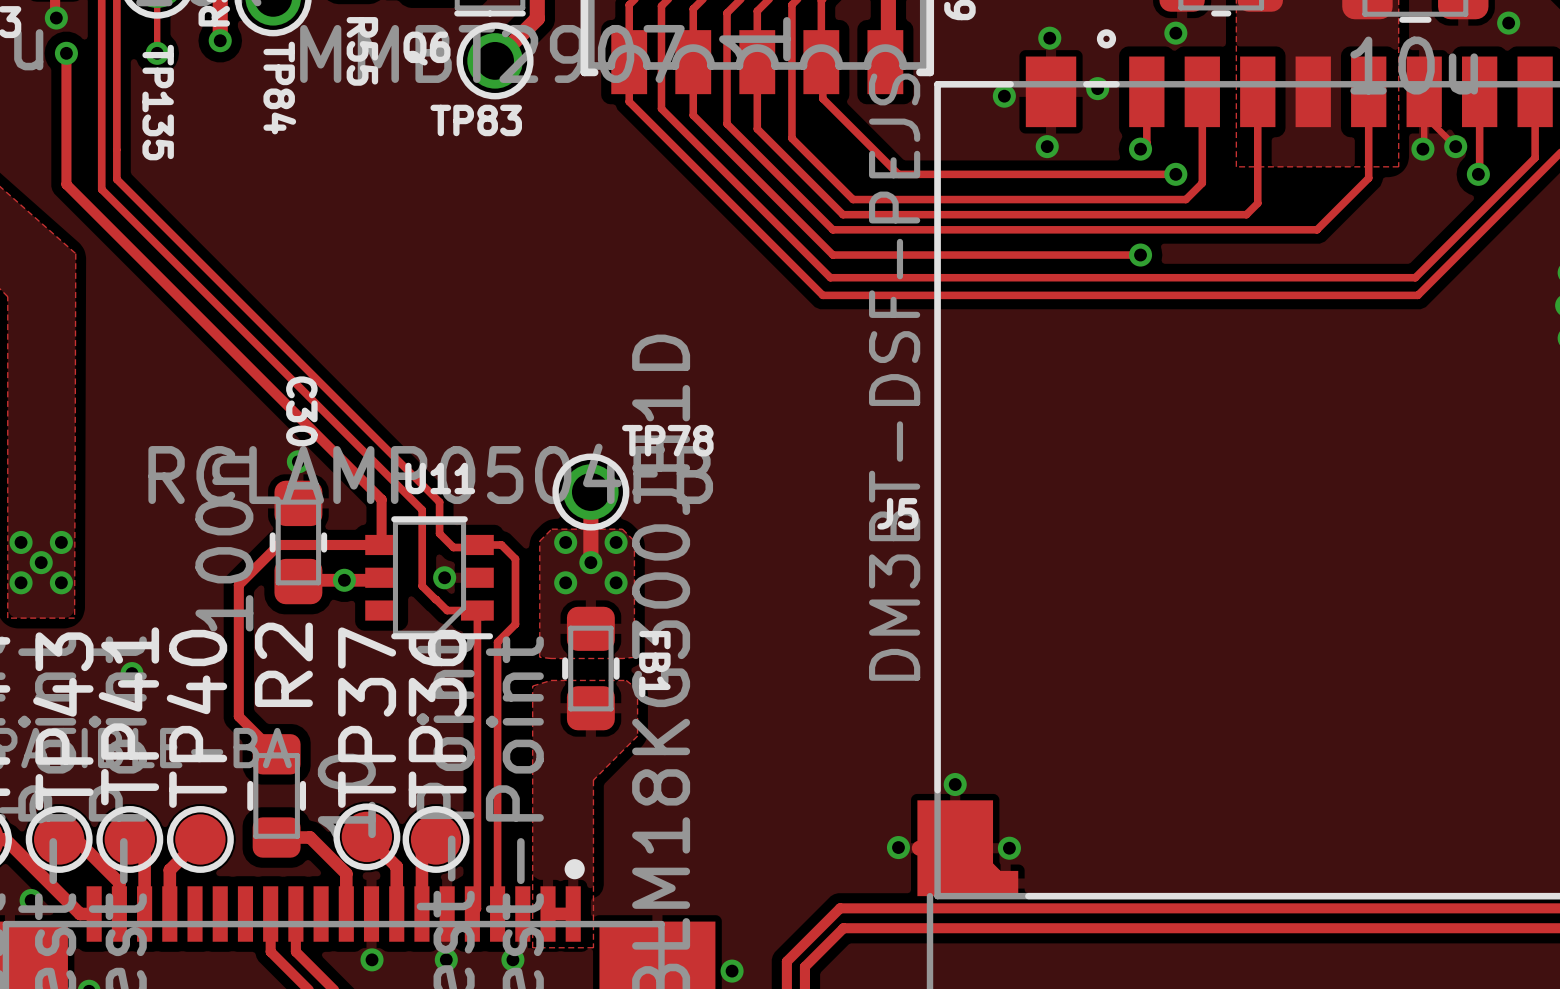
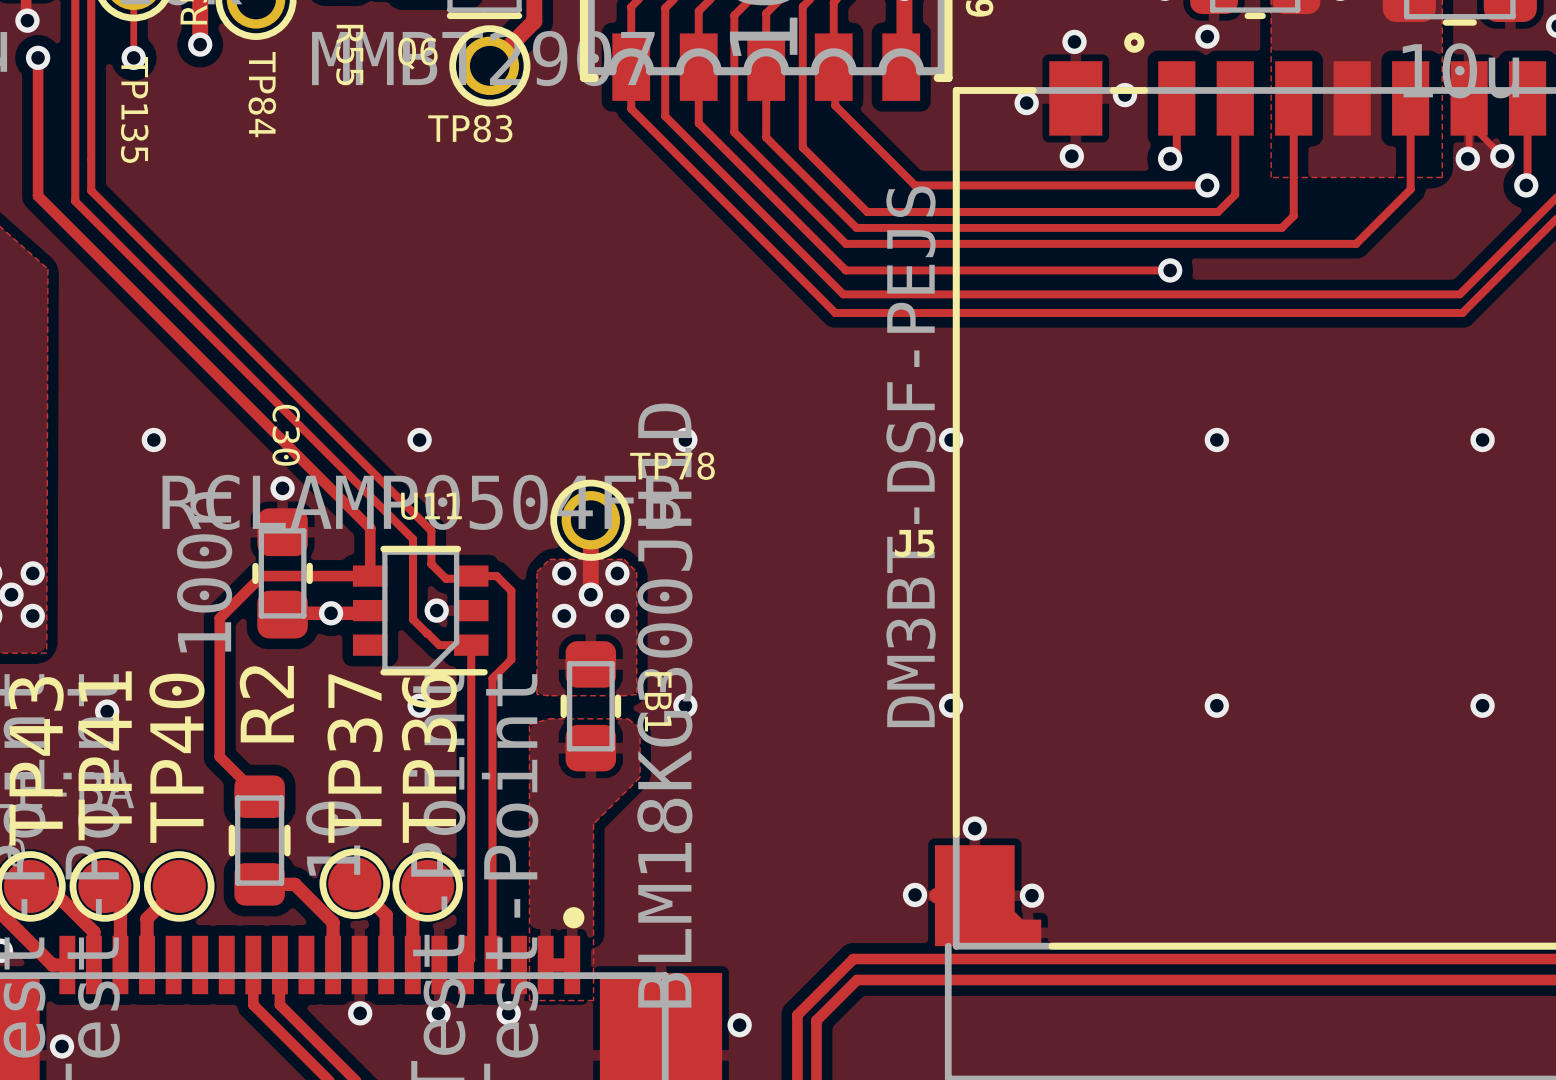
via: none -> (153, 439)
via: none -> (419, 439)
via: none -> (685, 439)
via: none -> (951, 439)
via: none -> (1216, 439)
via: none -> (1482, 439)
via: none -> (419, 705)
via: none -> (685, 705)
via: none -> (951, 705)
via: none -> (1216, 705)
via: none -> (1482, 705)

